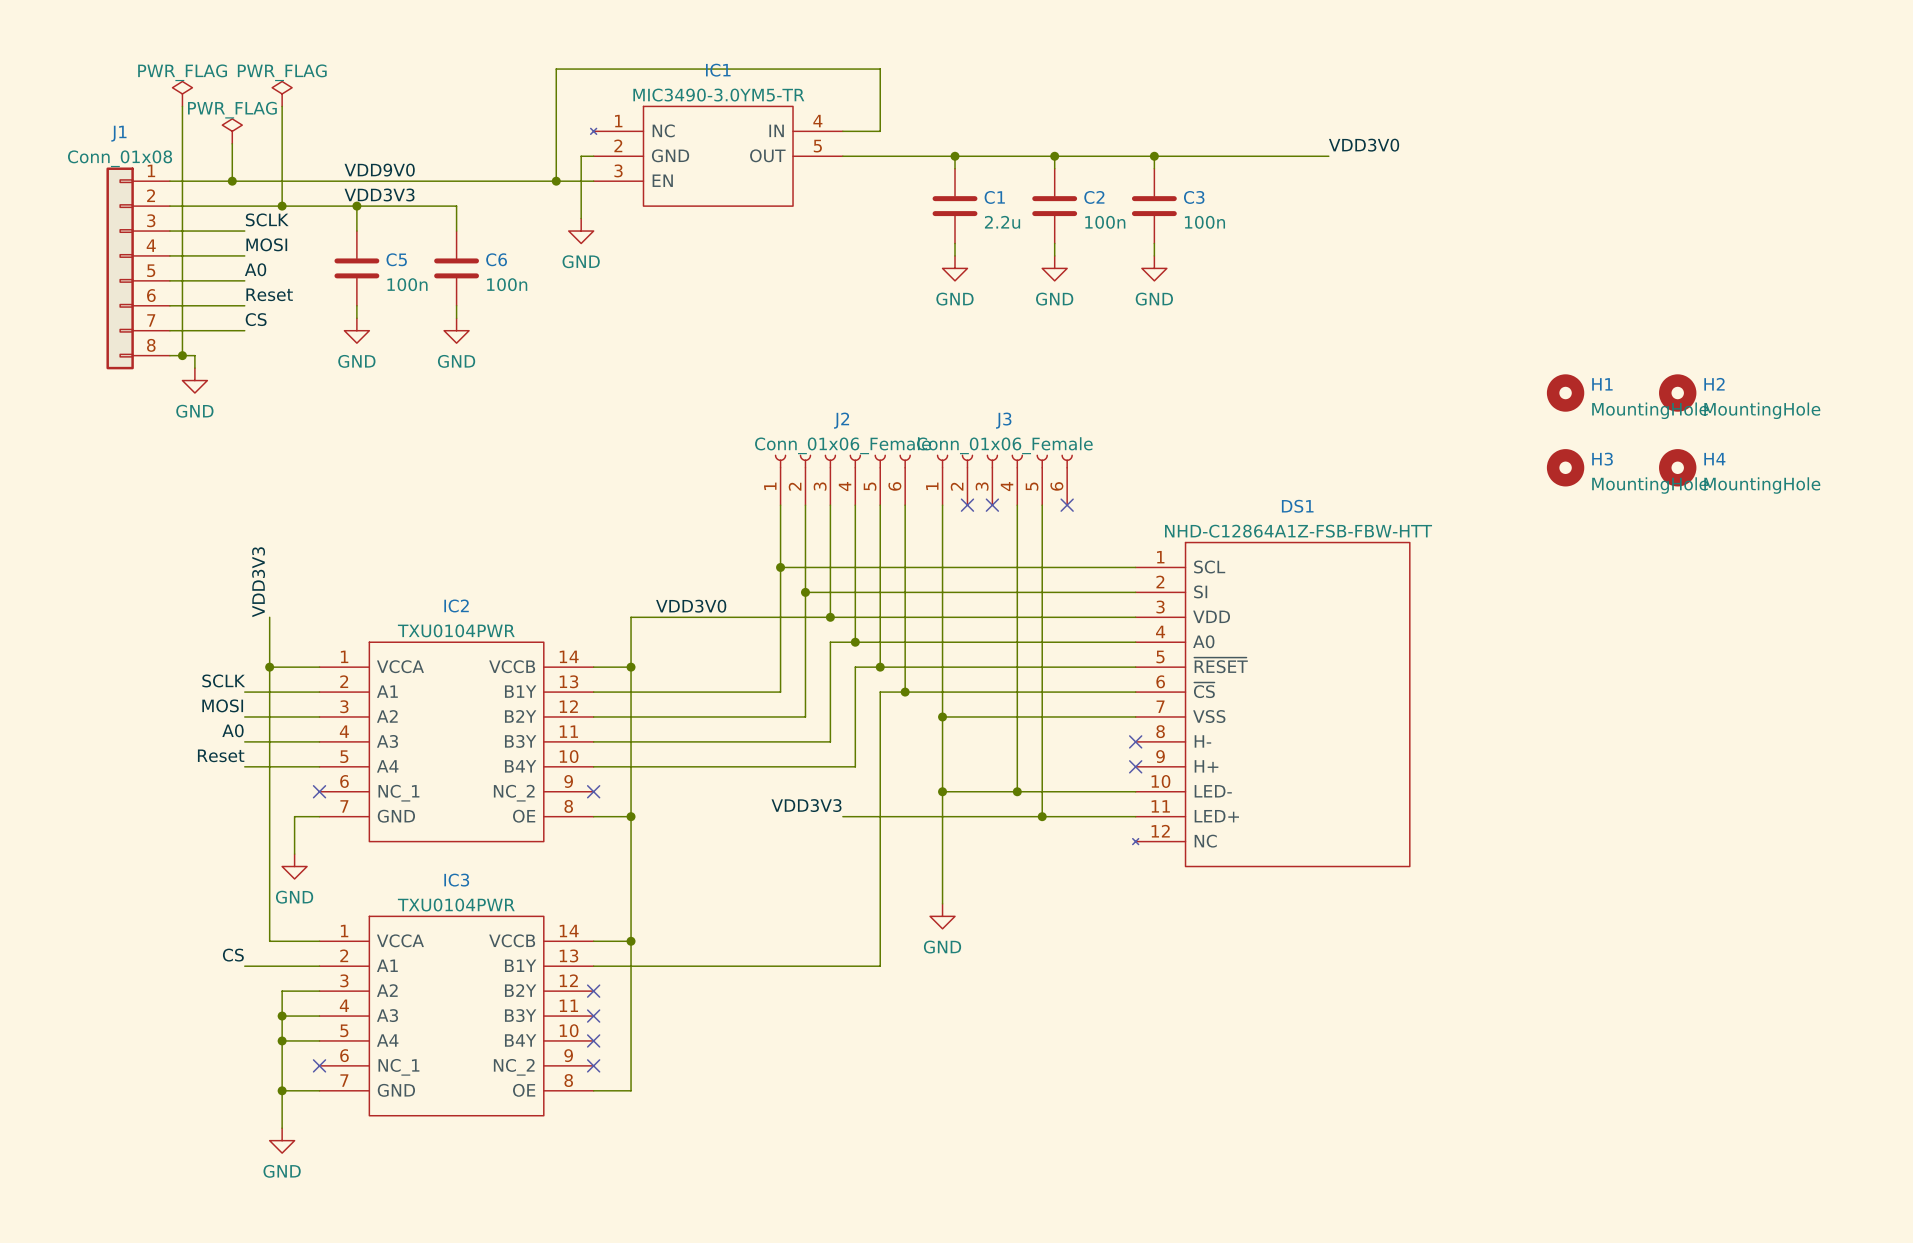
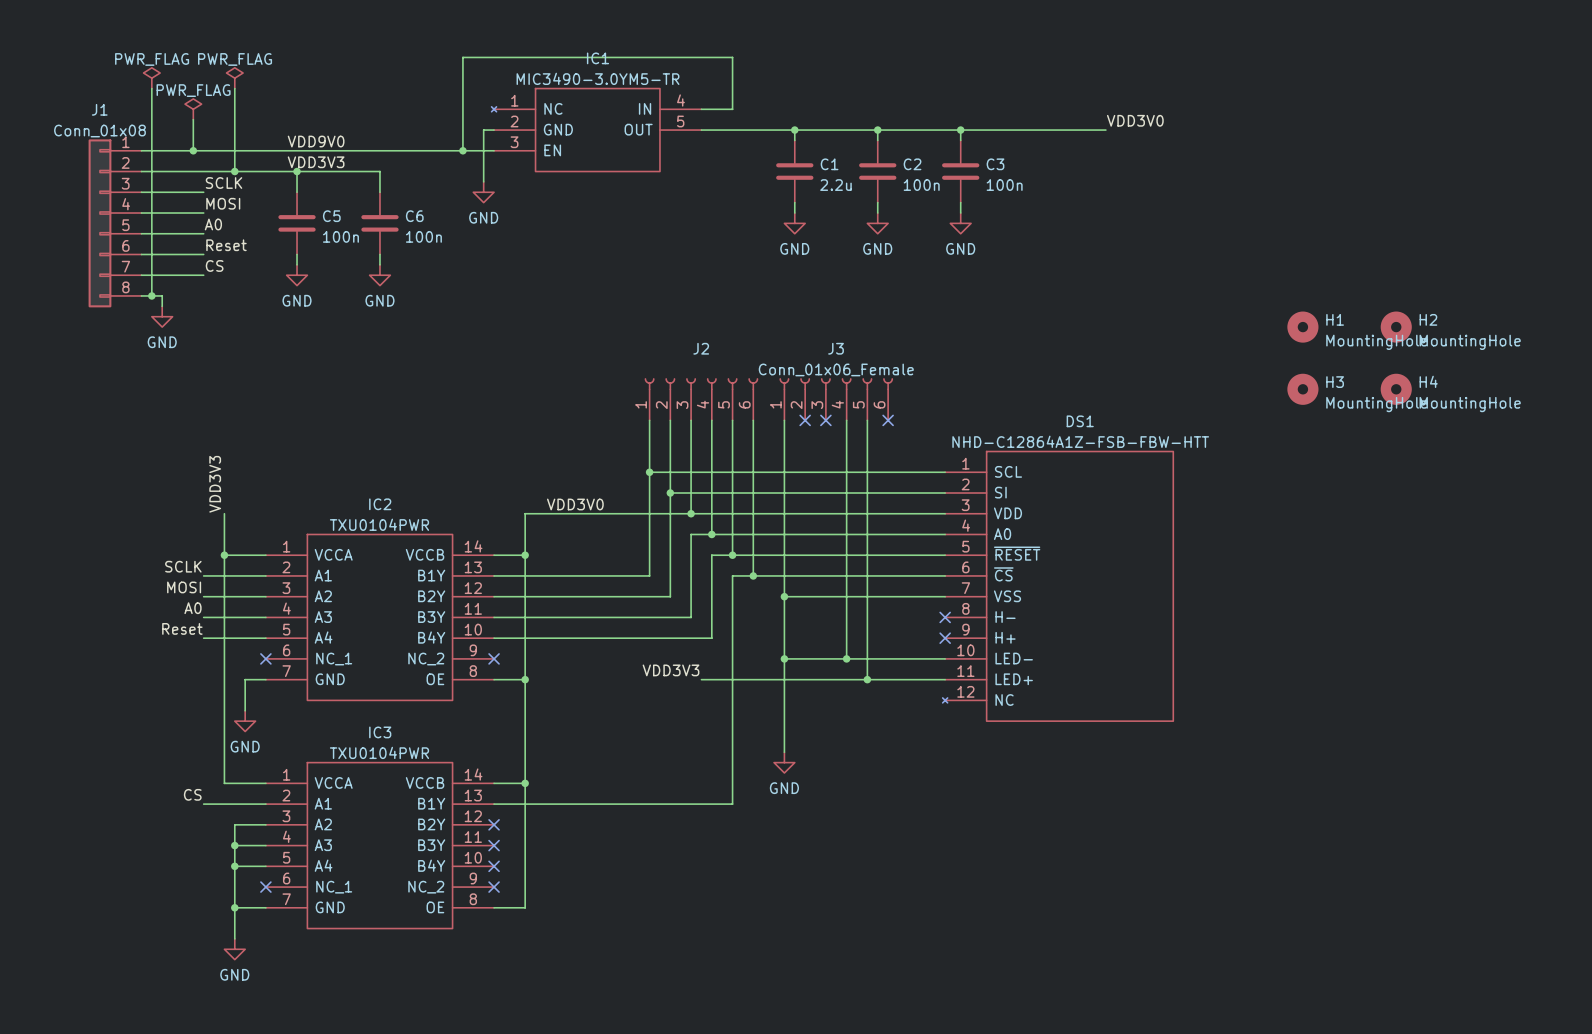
J2 value: Conn_01x06_Female (842, 445) -> none

